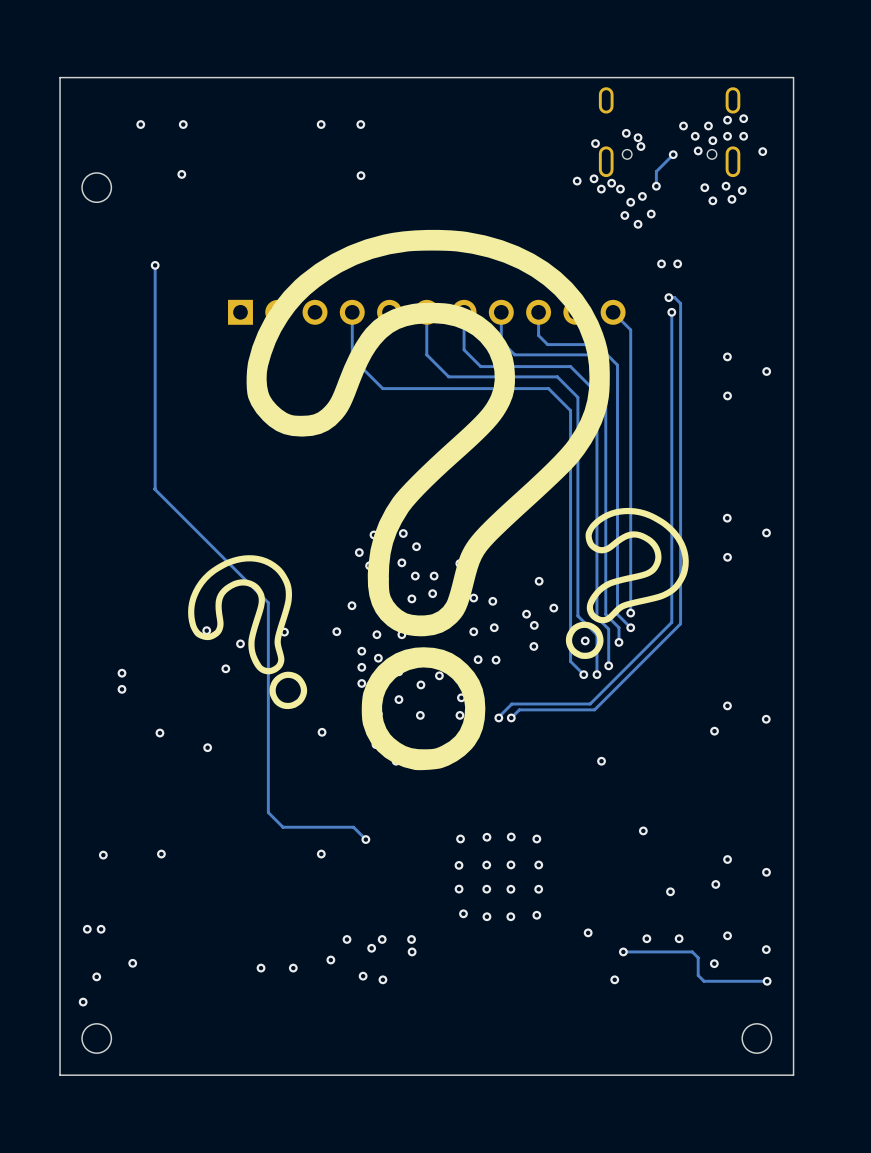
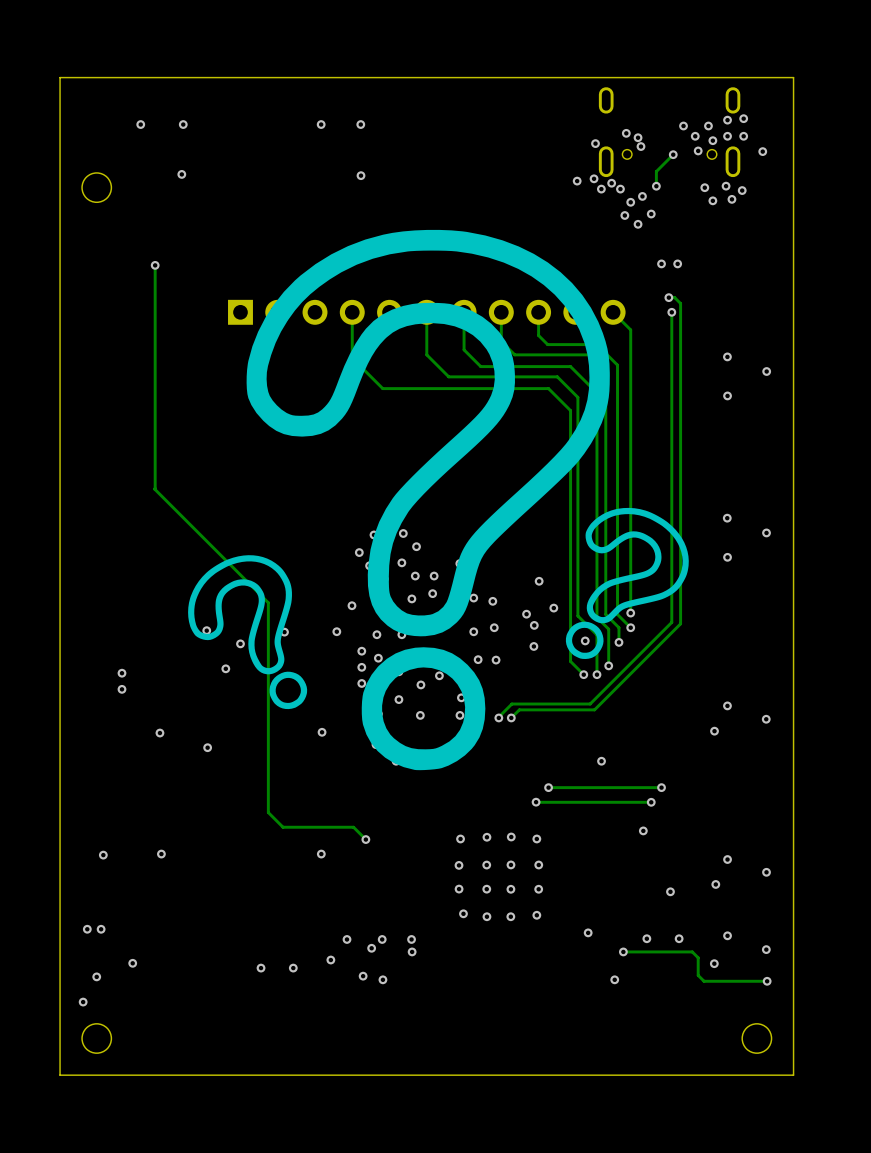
via: none -> (548, 787)
track: none -> (661, 787) (548, 787)
via: none -> (661, 787)
via: none -> (536, 802)
track: none -> (651, 802) (536, 802)
via: none -> (651, 802)

